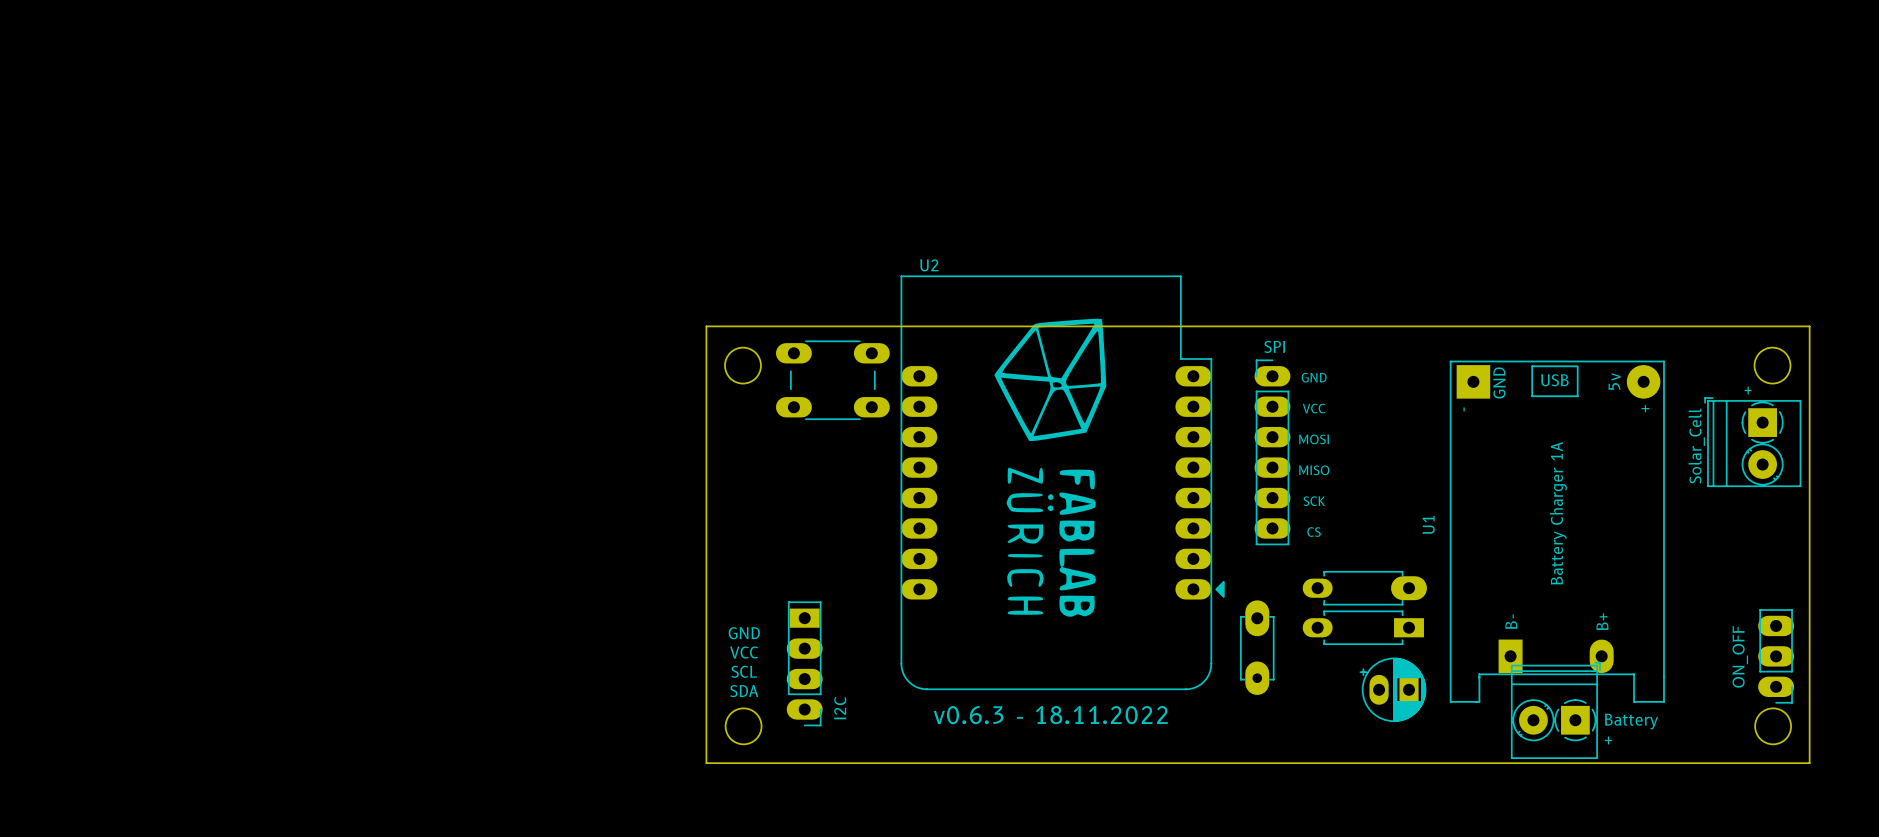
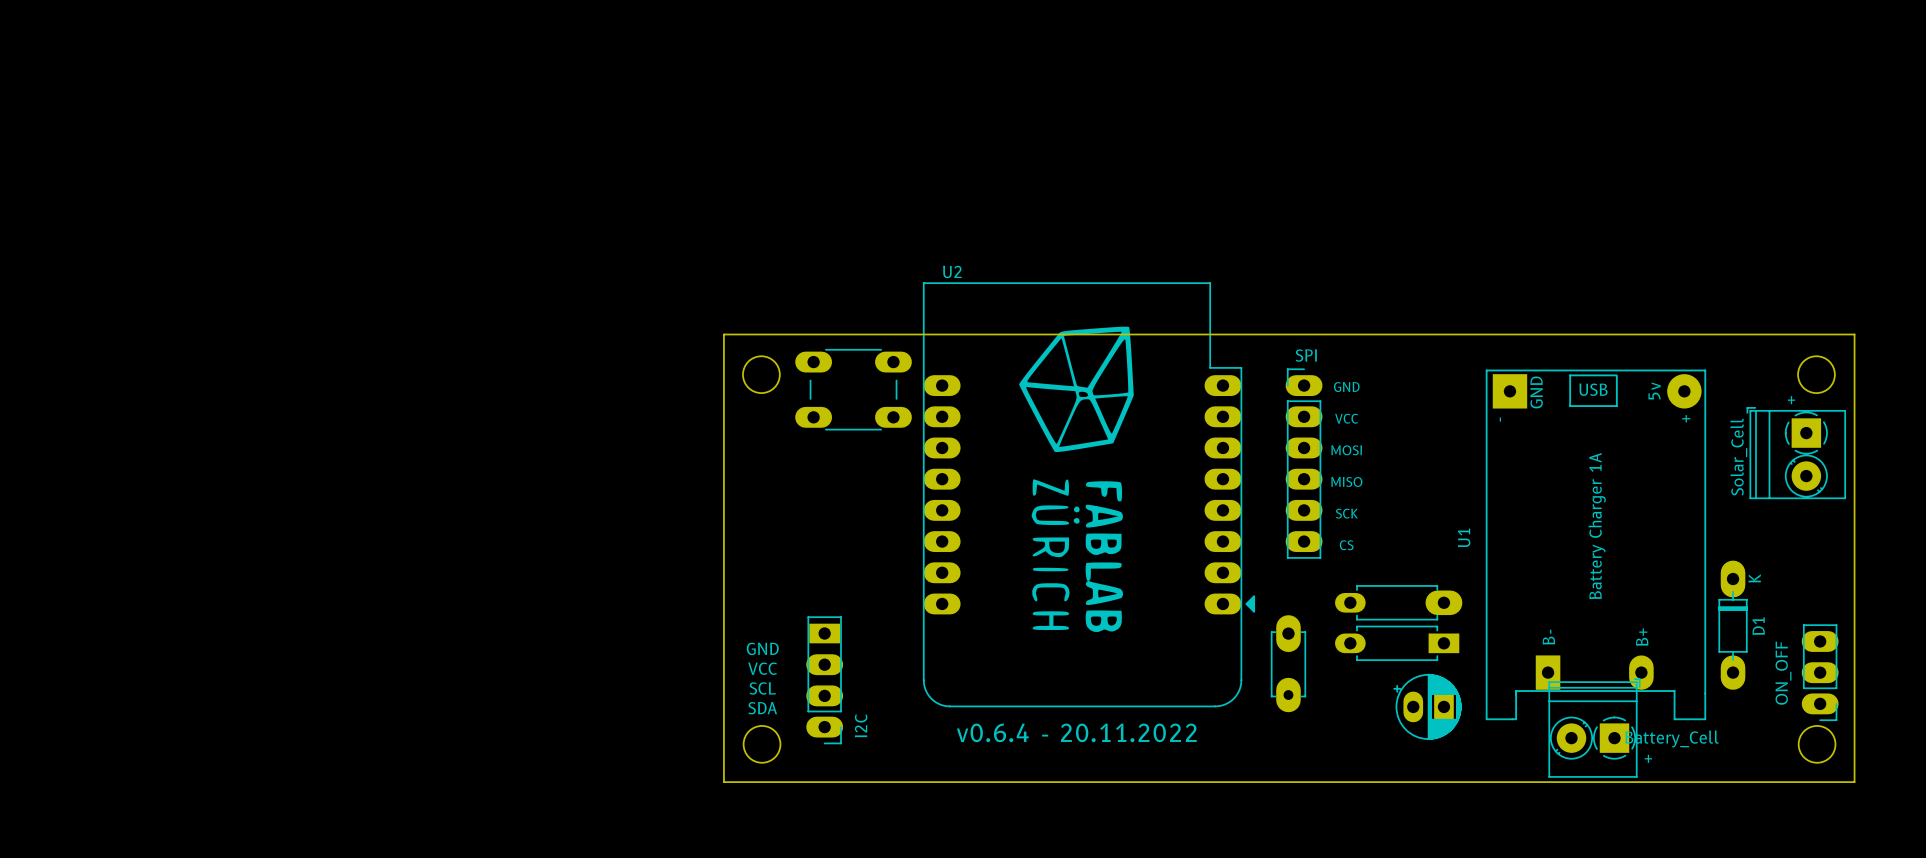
D1: none -> (1733, 625)
text: v0.6.3 - 18.11.2022 (1050, 715) -> v0.6.4 - 20.11.2022 (1076, 732)
part value: Battery (1631, 721) -> Battery_Cell (1672, 738)

